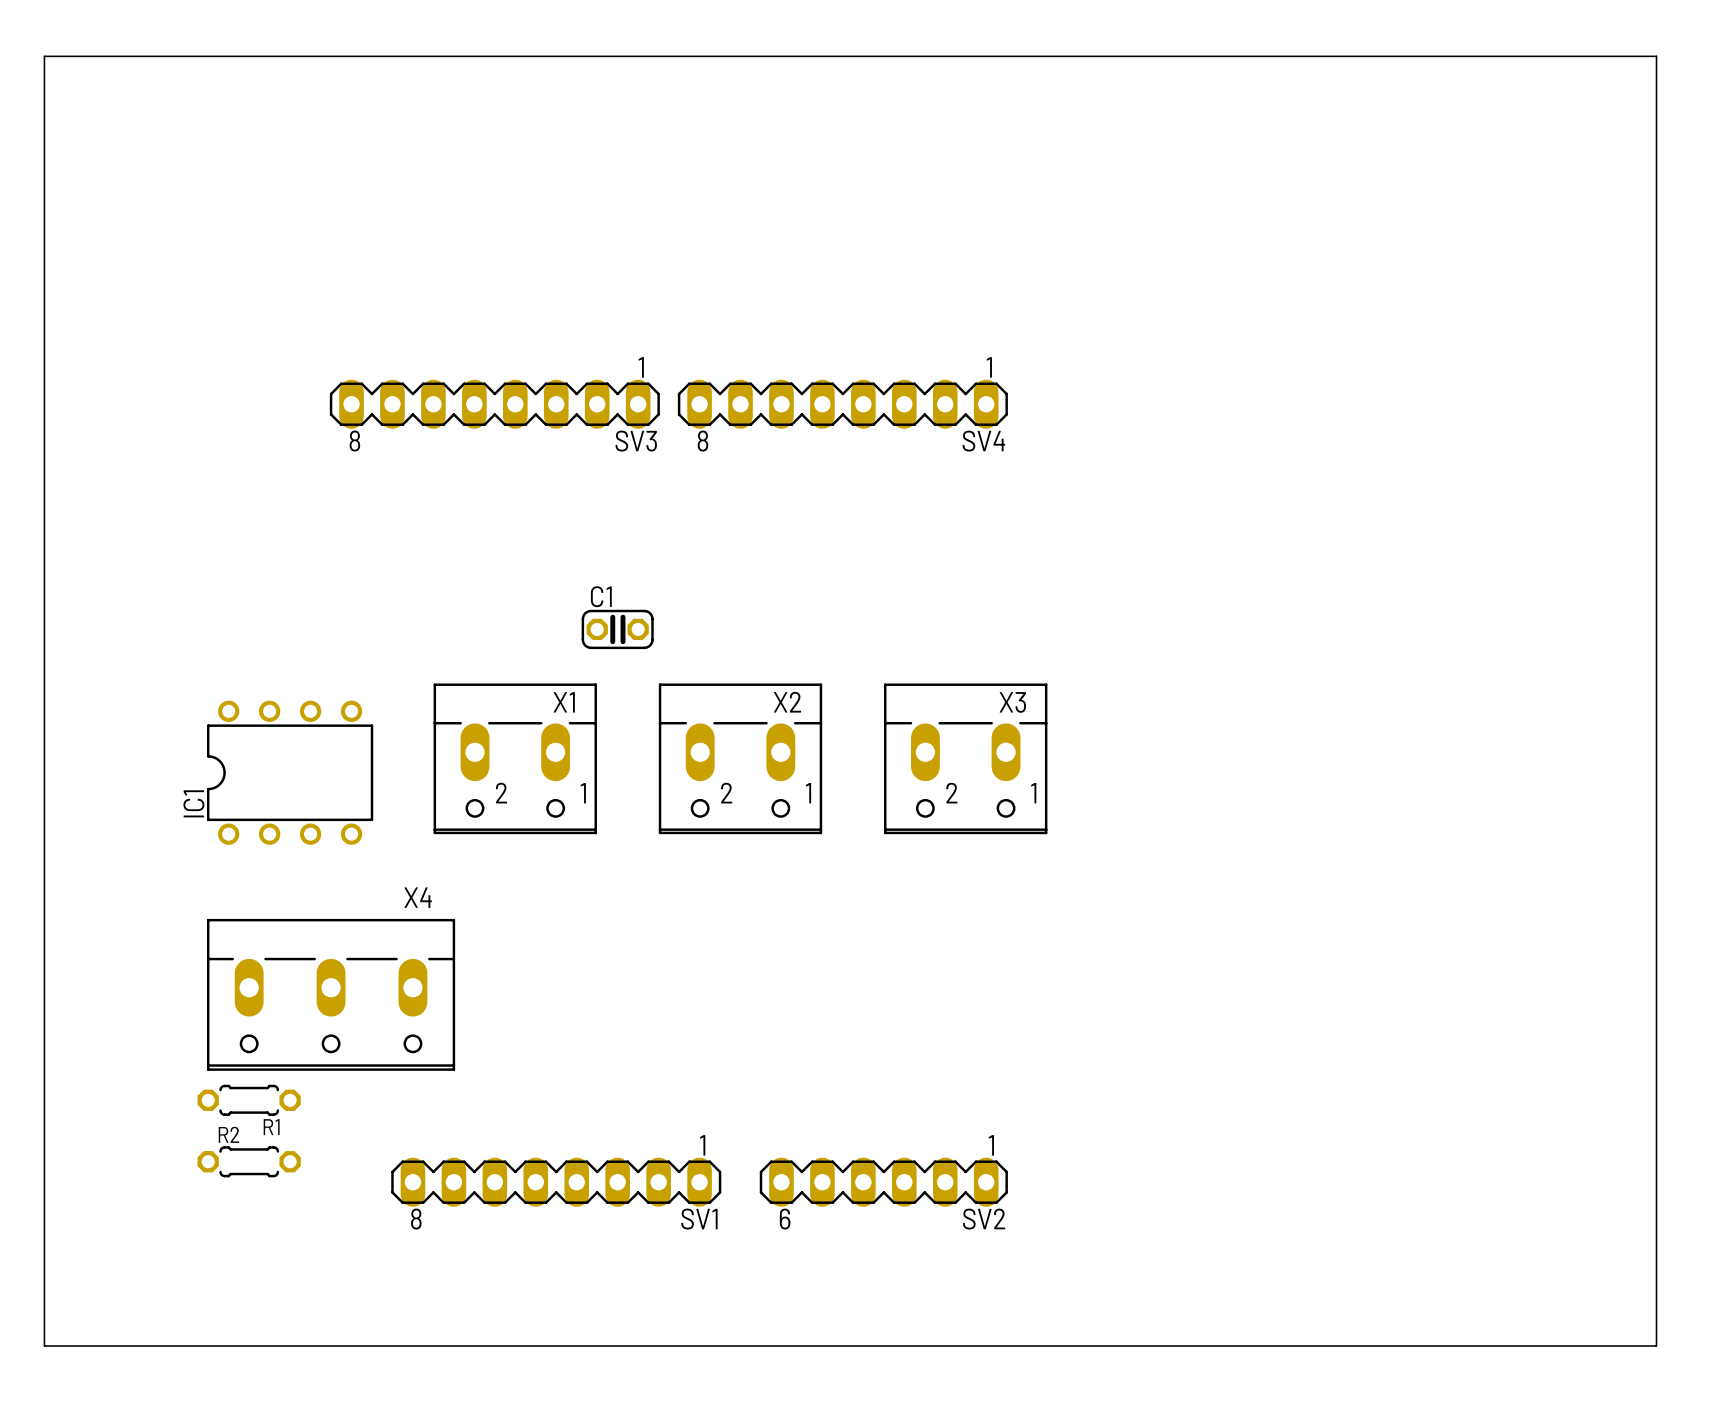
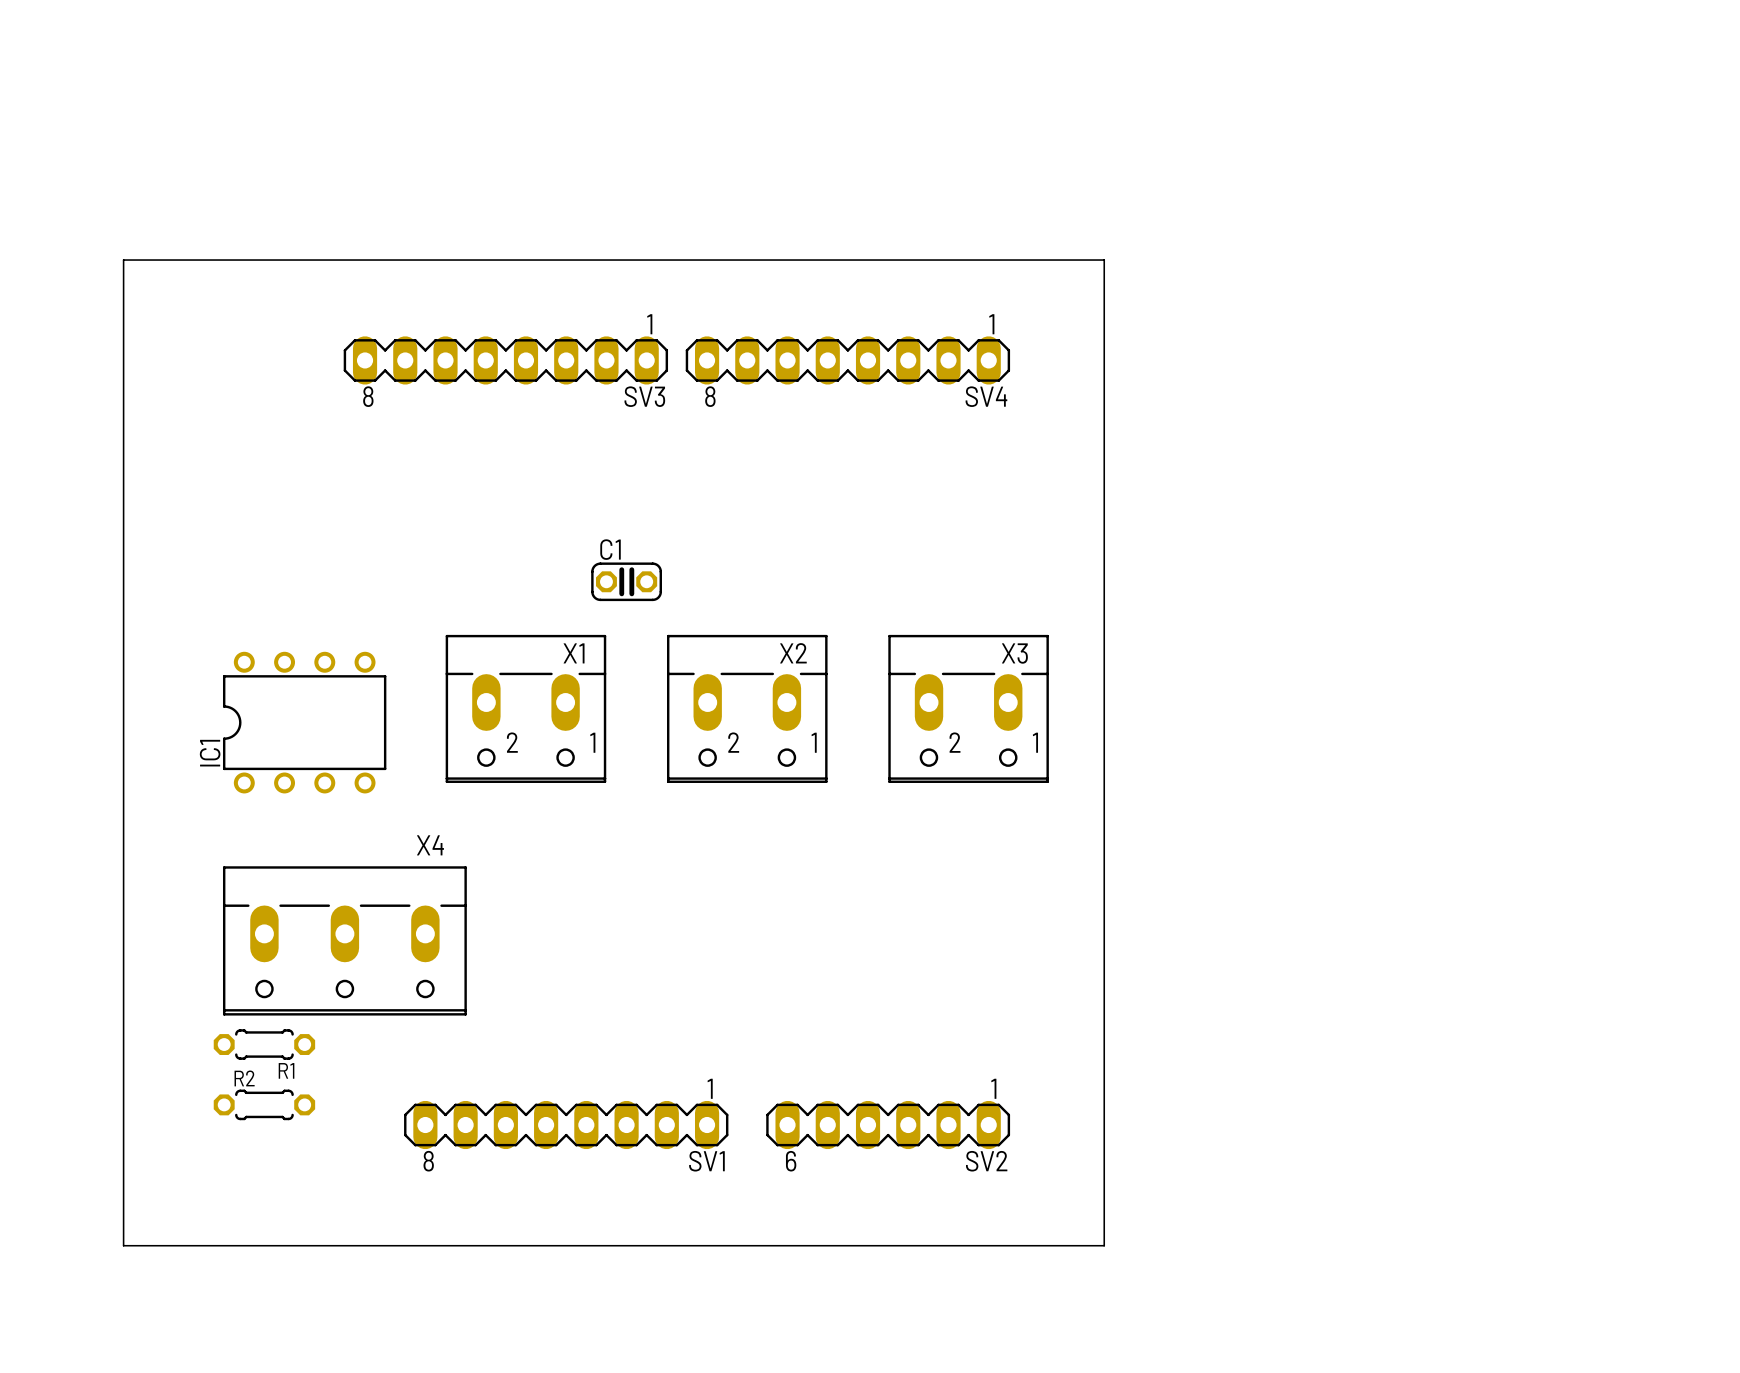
board edge: (44, 56) (1656, 56) (1656, 1346) (44, 1346) (44, 56) -> none
board edge: none -> (123, 260) (1104, 260) (1104, 1245) (123, 1245) (123, 260)

